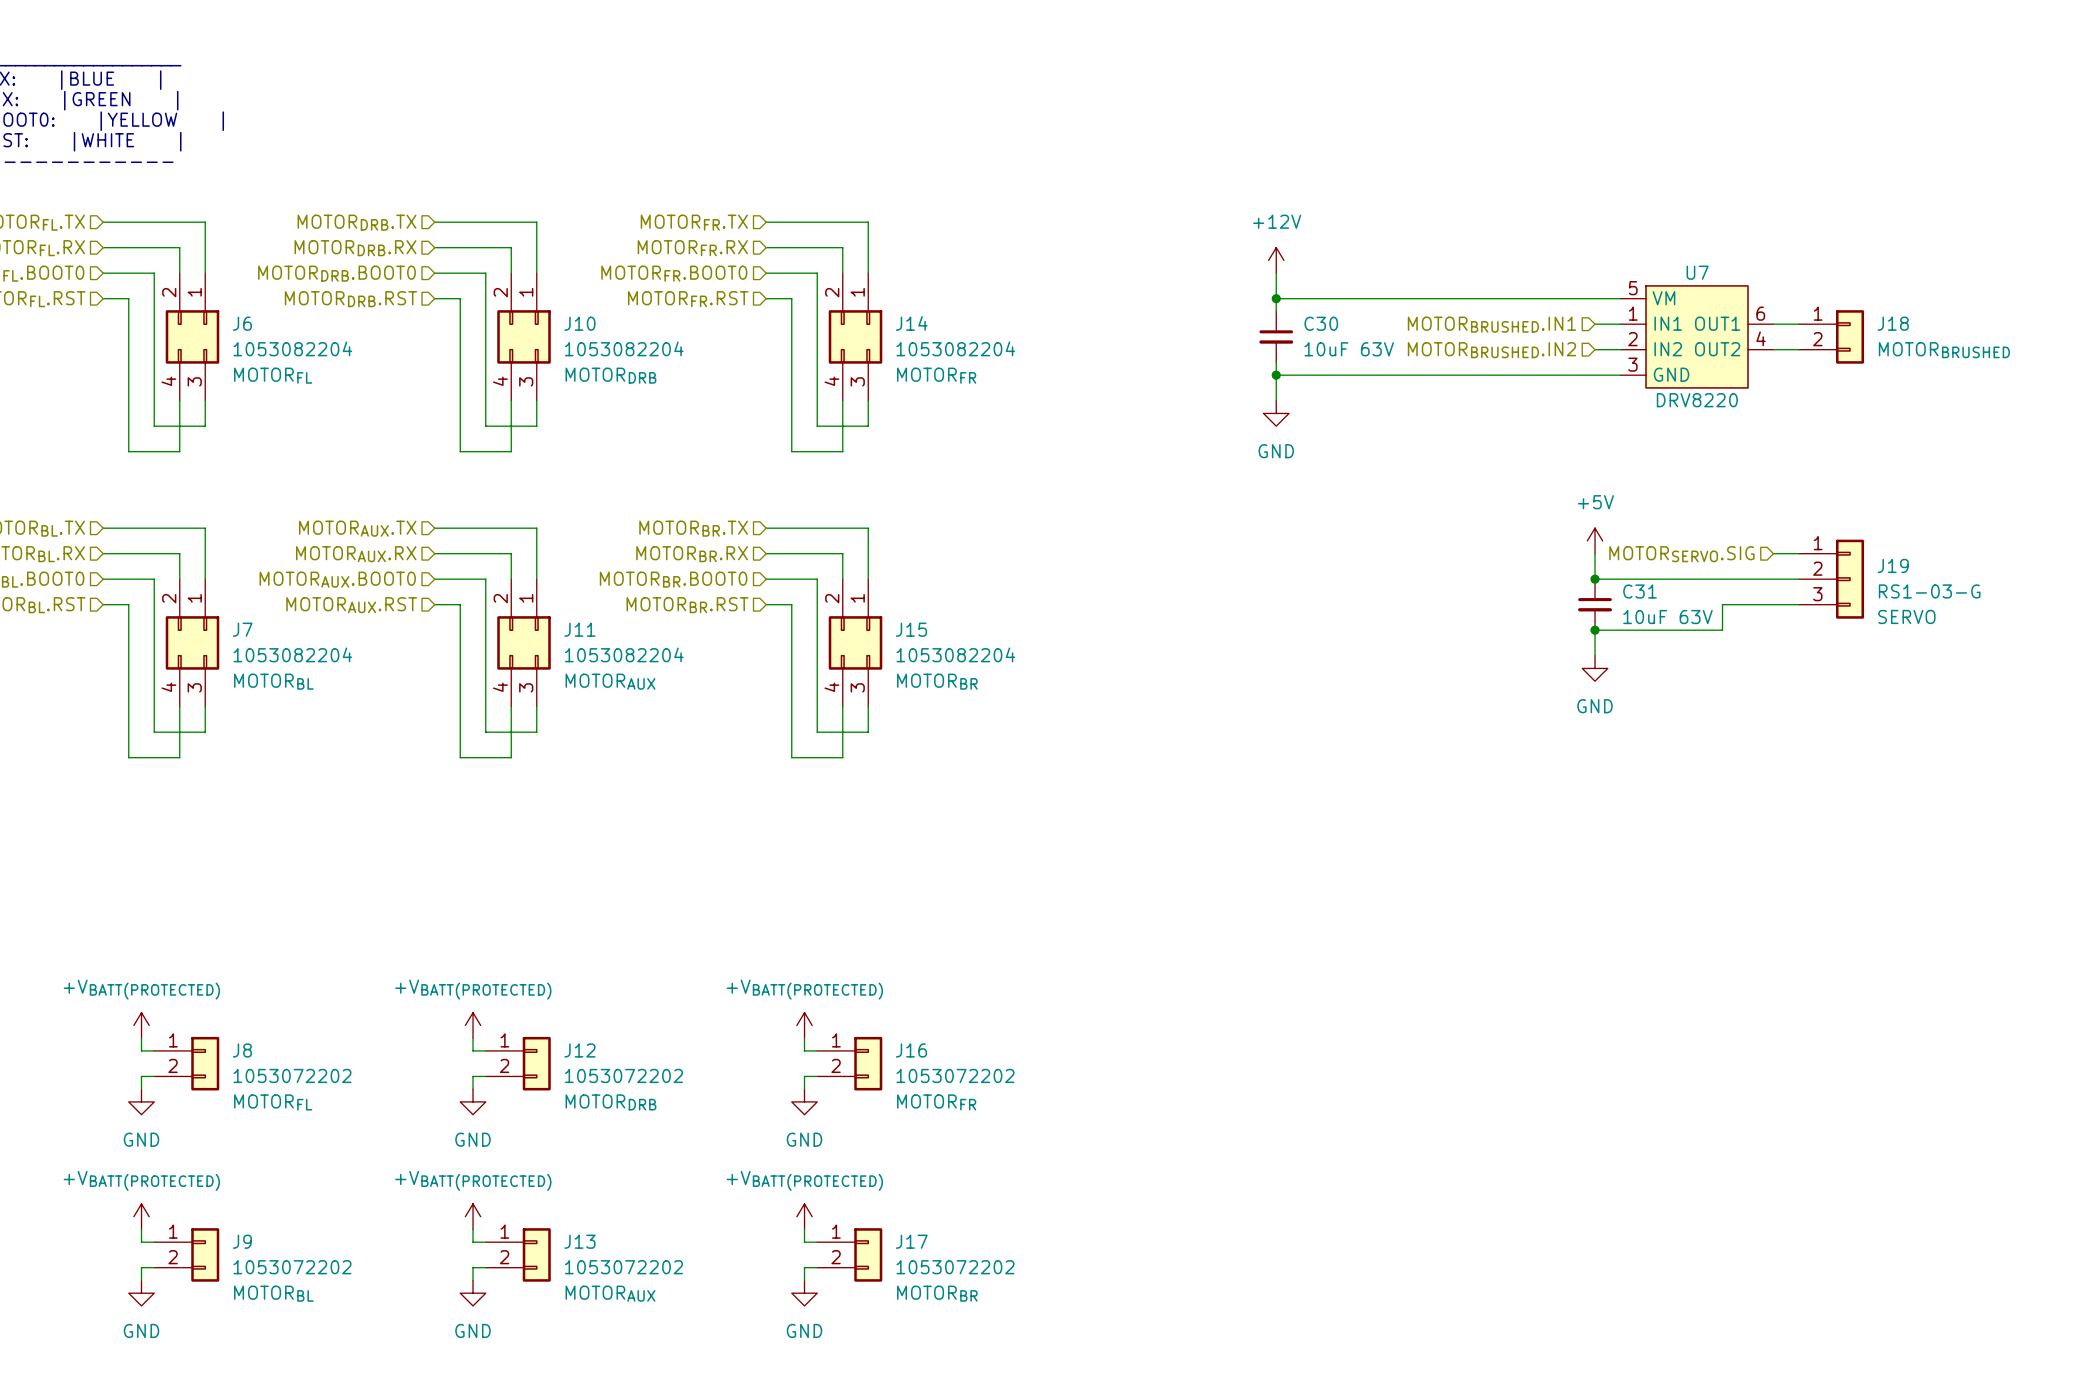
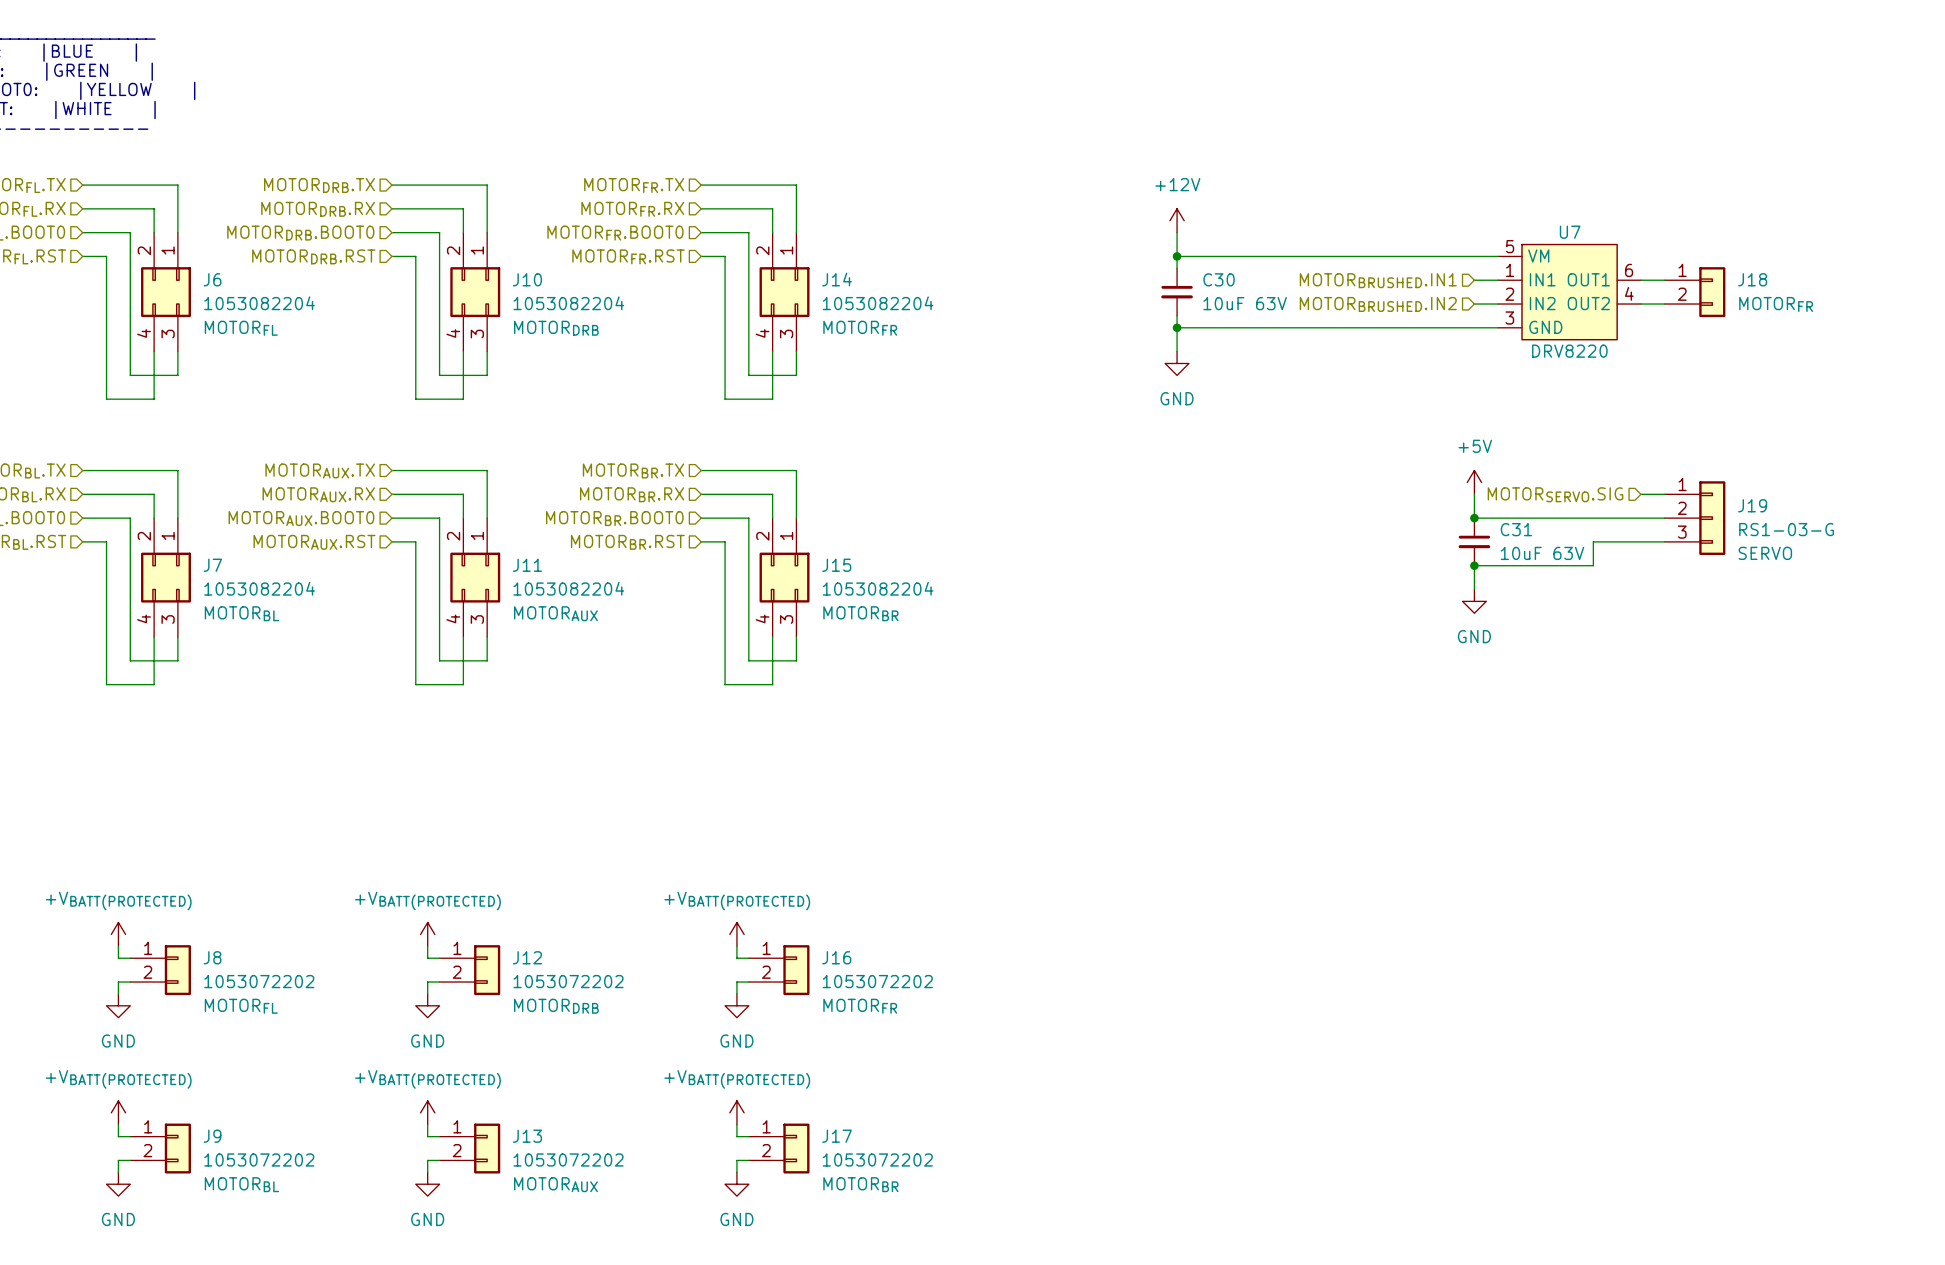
J18 value: MOTORBRUSHED (1944, 350) -> MOTORFR (1776, 304)

